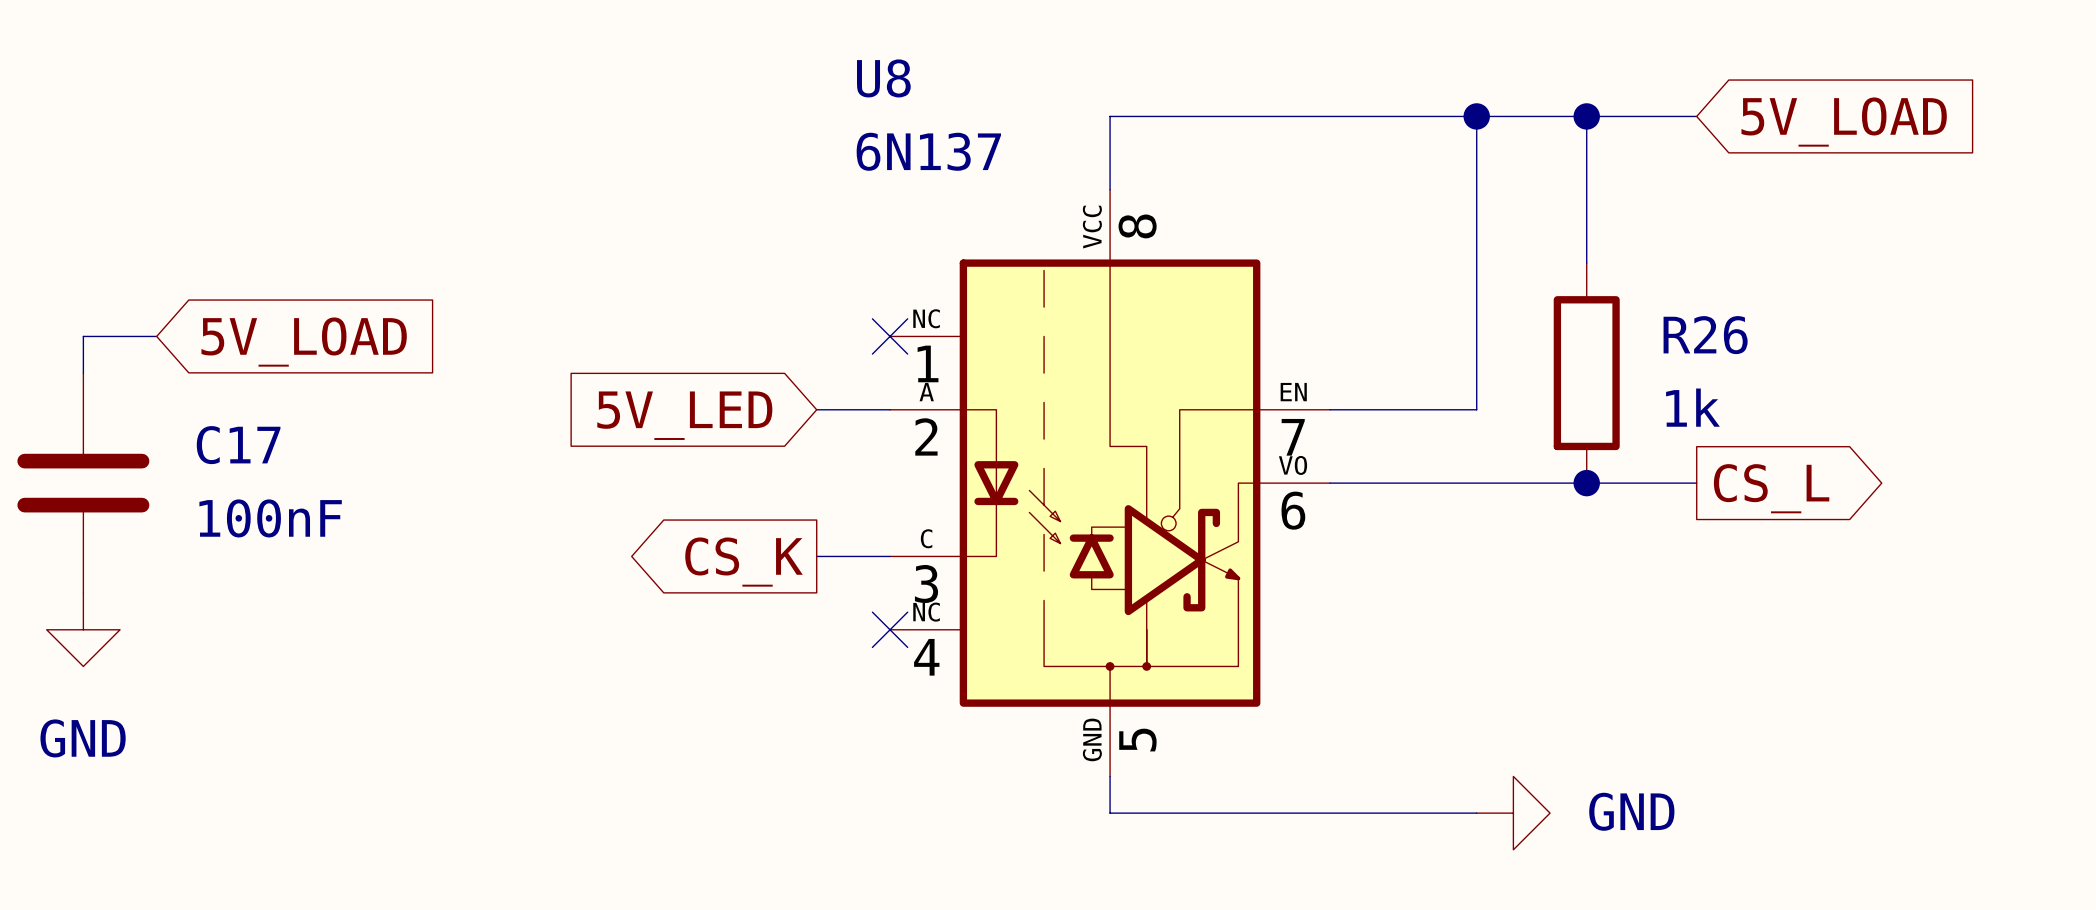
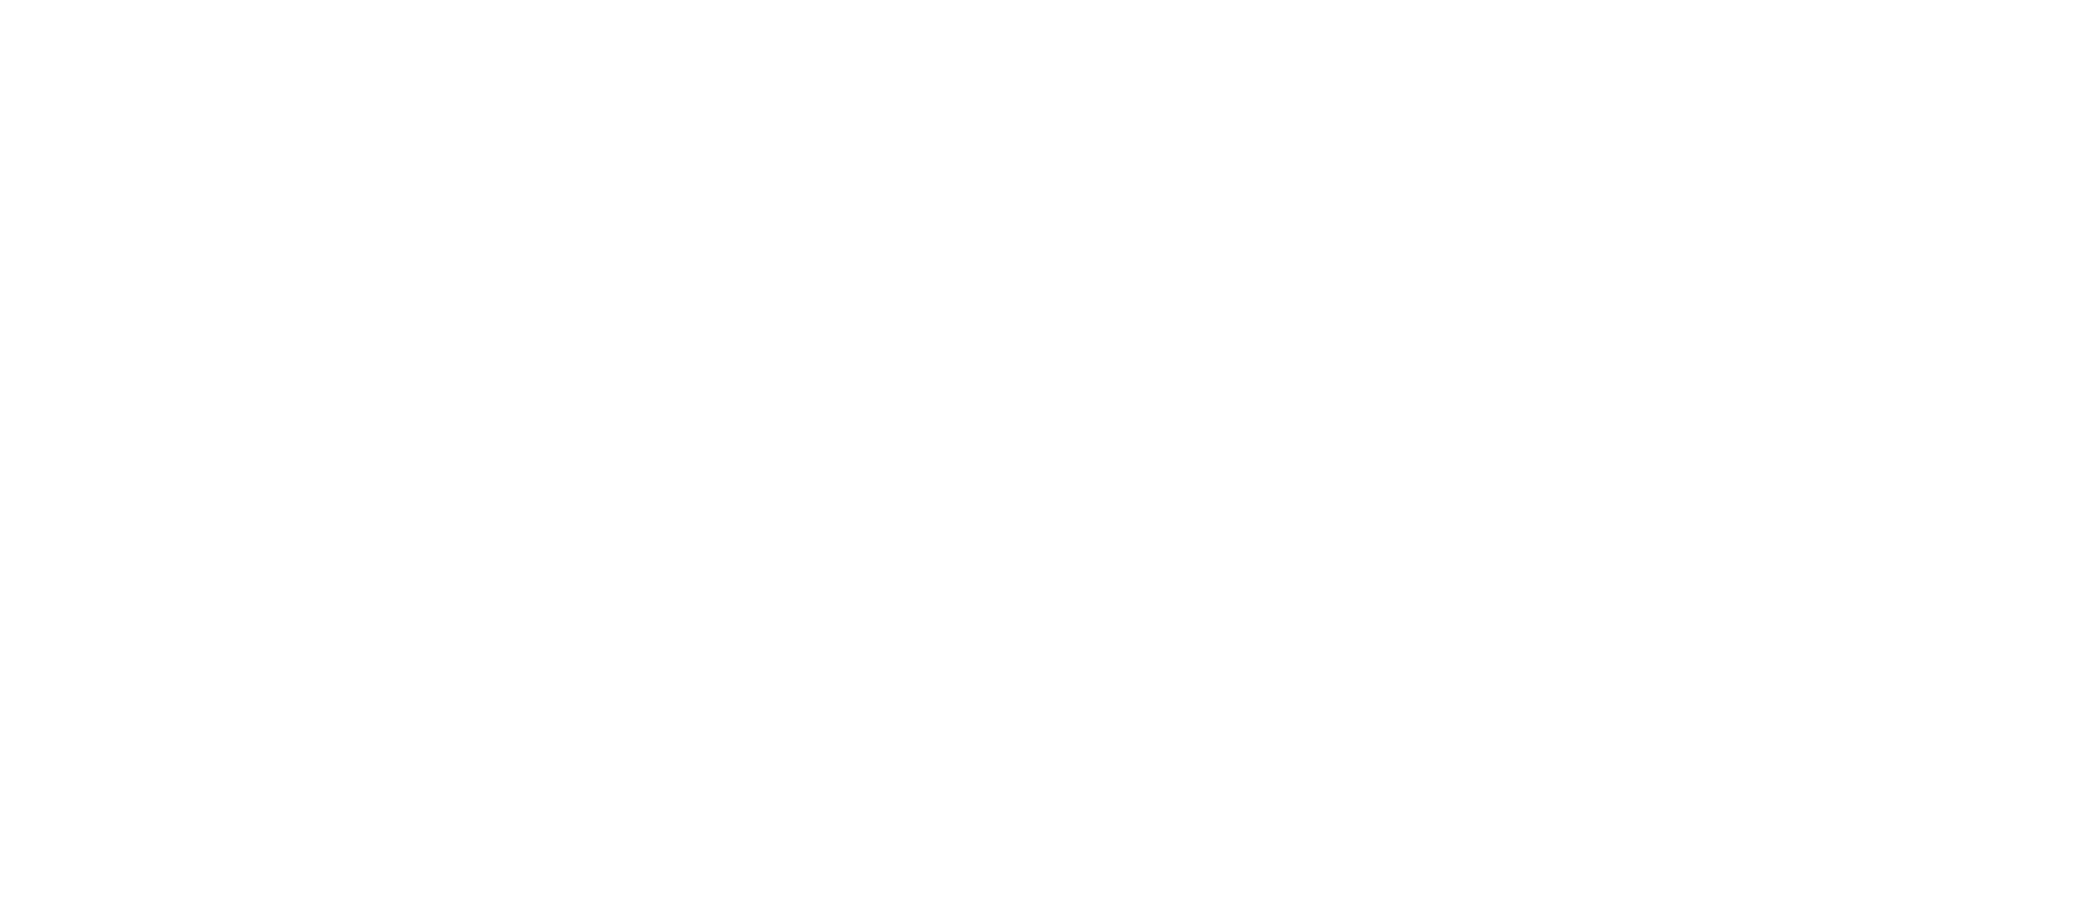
wire: (1476, 116) (1476, 409) (1330, 409) -> none
junction: (1476, 116) -> none
wire: (1586, 116) (1586, 263) -> none
junction: (1586, 116) -> none
wire: (1696, 116) (1110, 116) (1110, 189) -> none
global label: 5V_LOAD (1844, 122) -> none
wire: (156, 336) (83, 336) (83, 373) -> none
no-connect mark: (890, 336) -> none
global label: 5V_LOAD (304, 342) -> none
R26: 1k (1586, 373) -> none
wire: (816, 409) (890, 409) -> none
global label: 5V_LED (684, 415) -> none
C17: 100nF (83, 483) -> none
U8: 6N137 (1110, 483) -> none
wire: (1330, 483) (1696, 483) -> none
junction: (1586, 483) -> none
global label: CS_L (1771, 488) -> none
wire: (816, 556) (890, 556) -> none
global label: CS_K (744, 562) -> none
power symbol: GND (83, 629) -> none
no-connect mark: (890, 629) -> none
wire: (1110, 776) (1110, 813) (1476, 813) -> none
power symbol: GND (1513, 813) -> none

